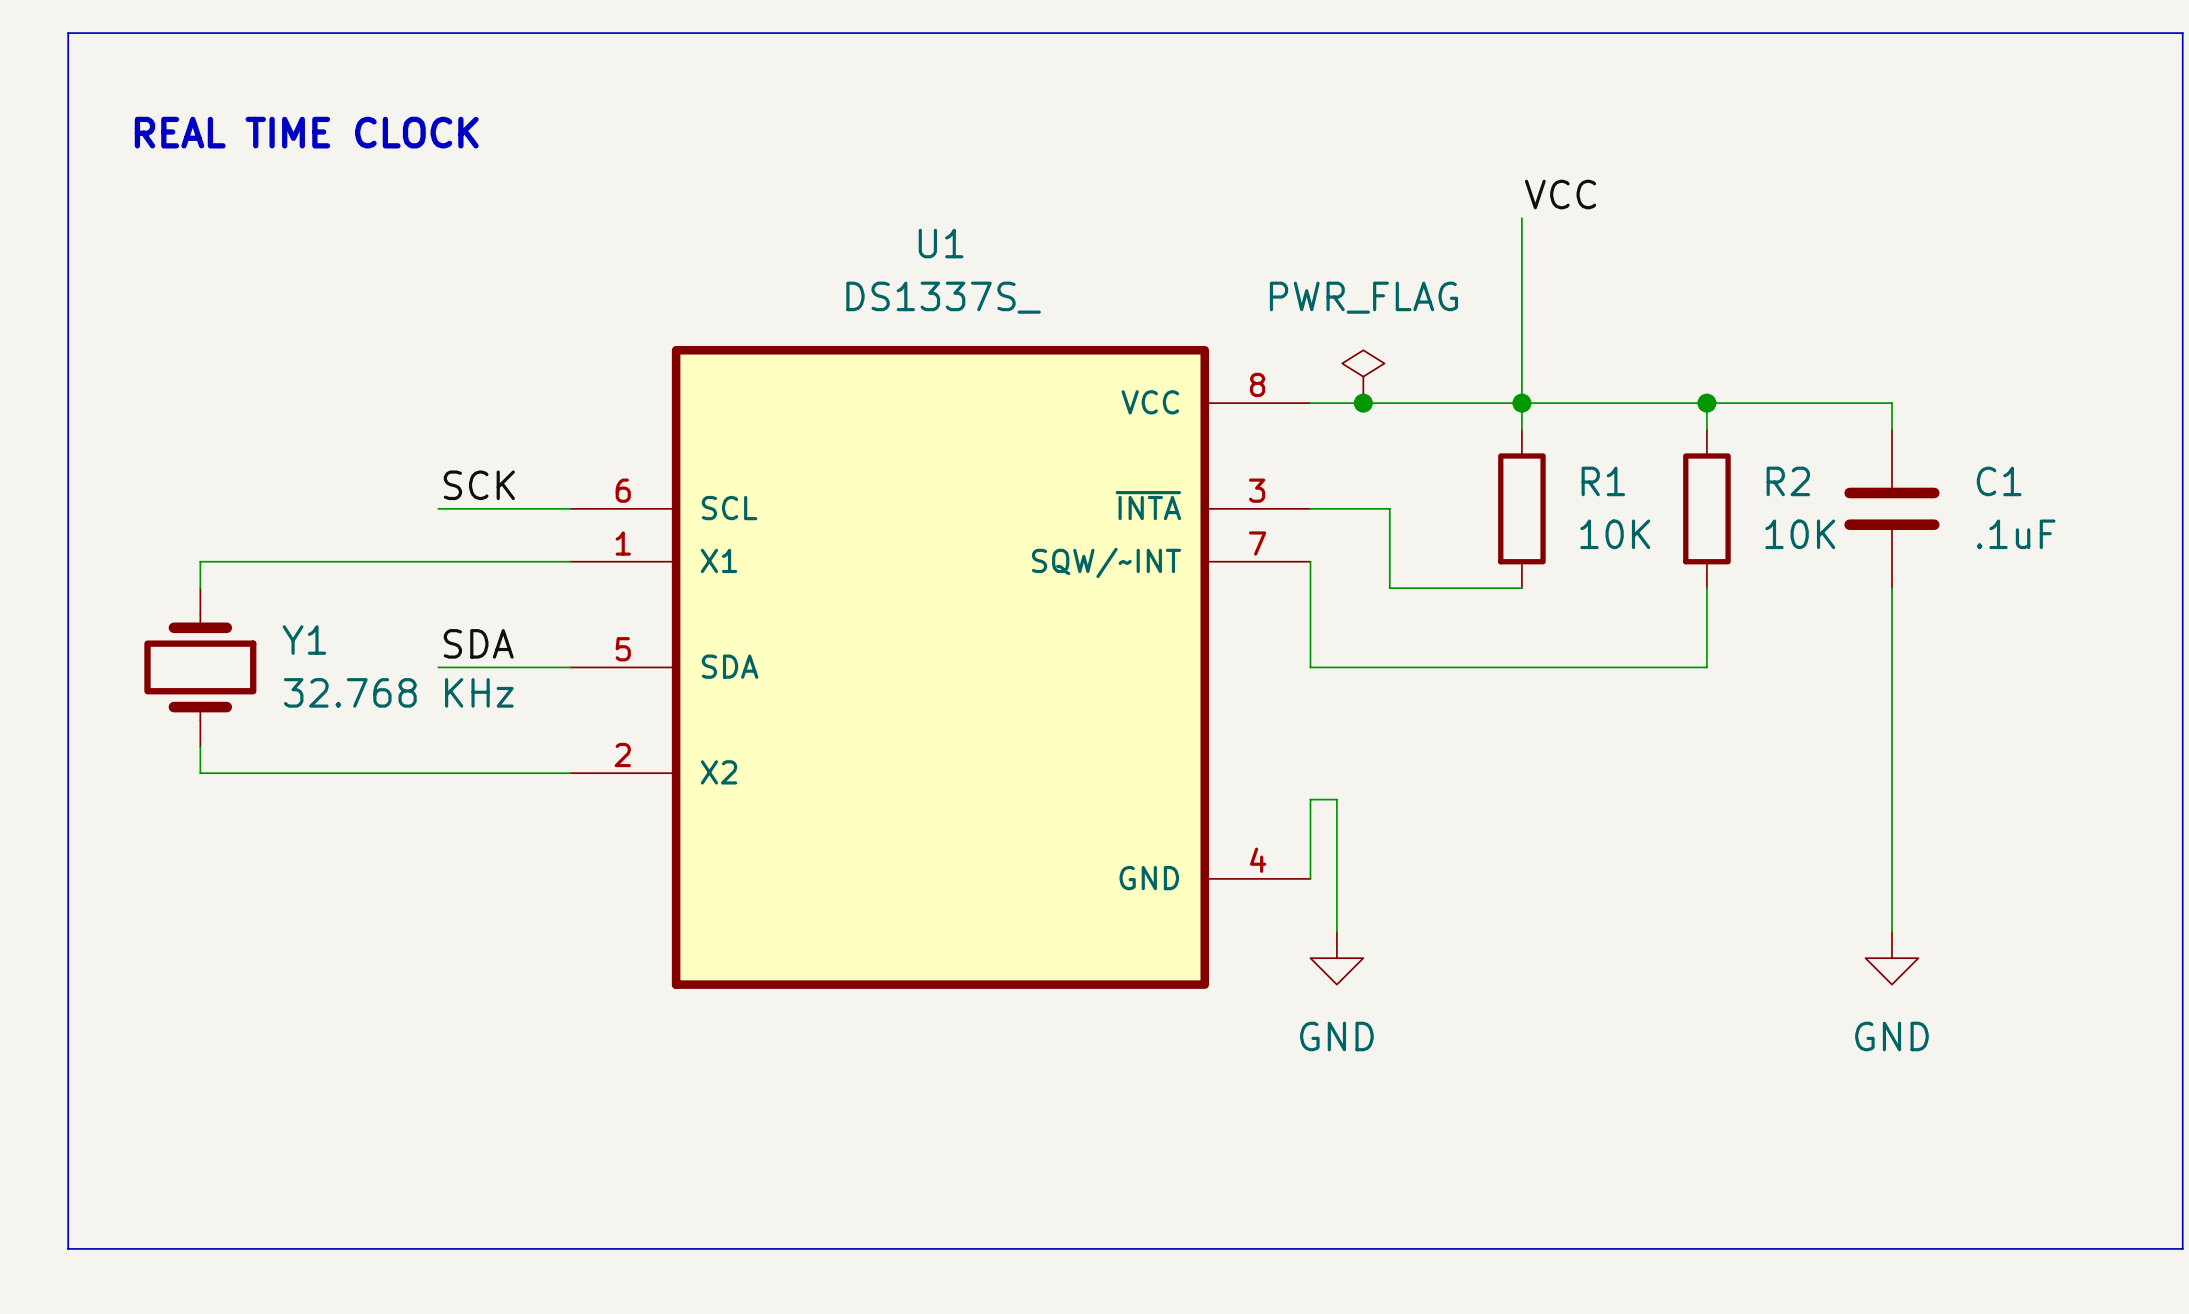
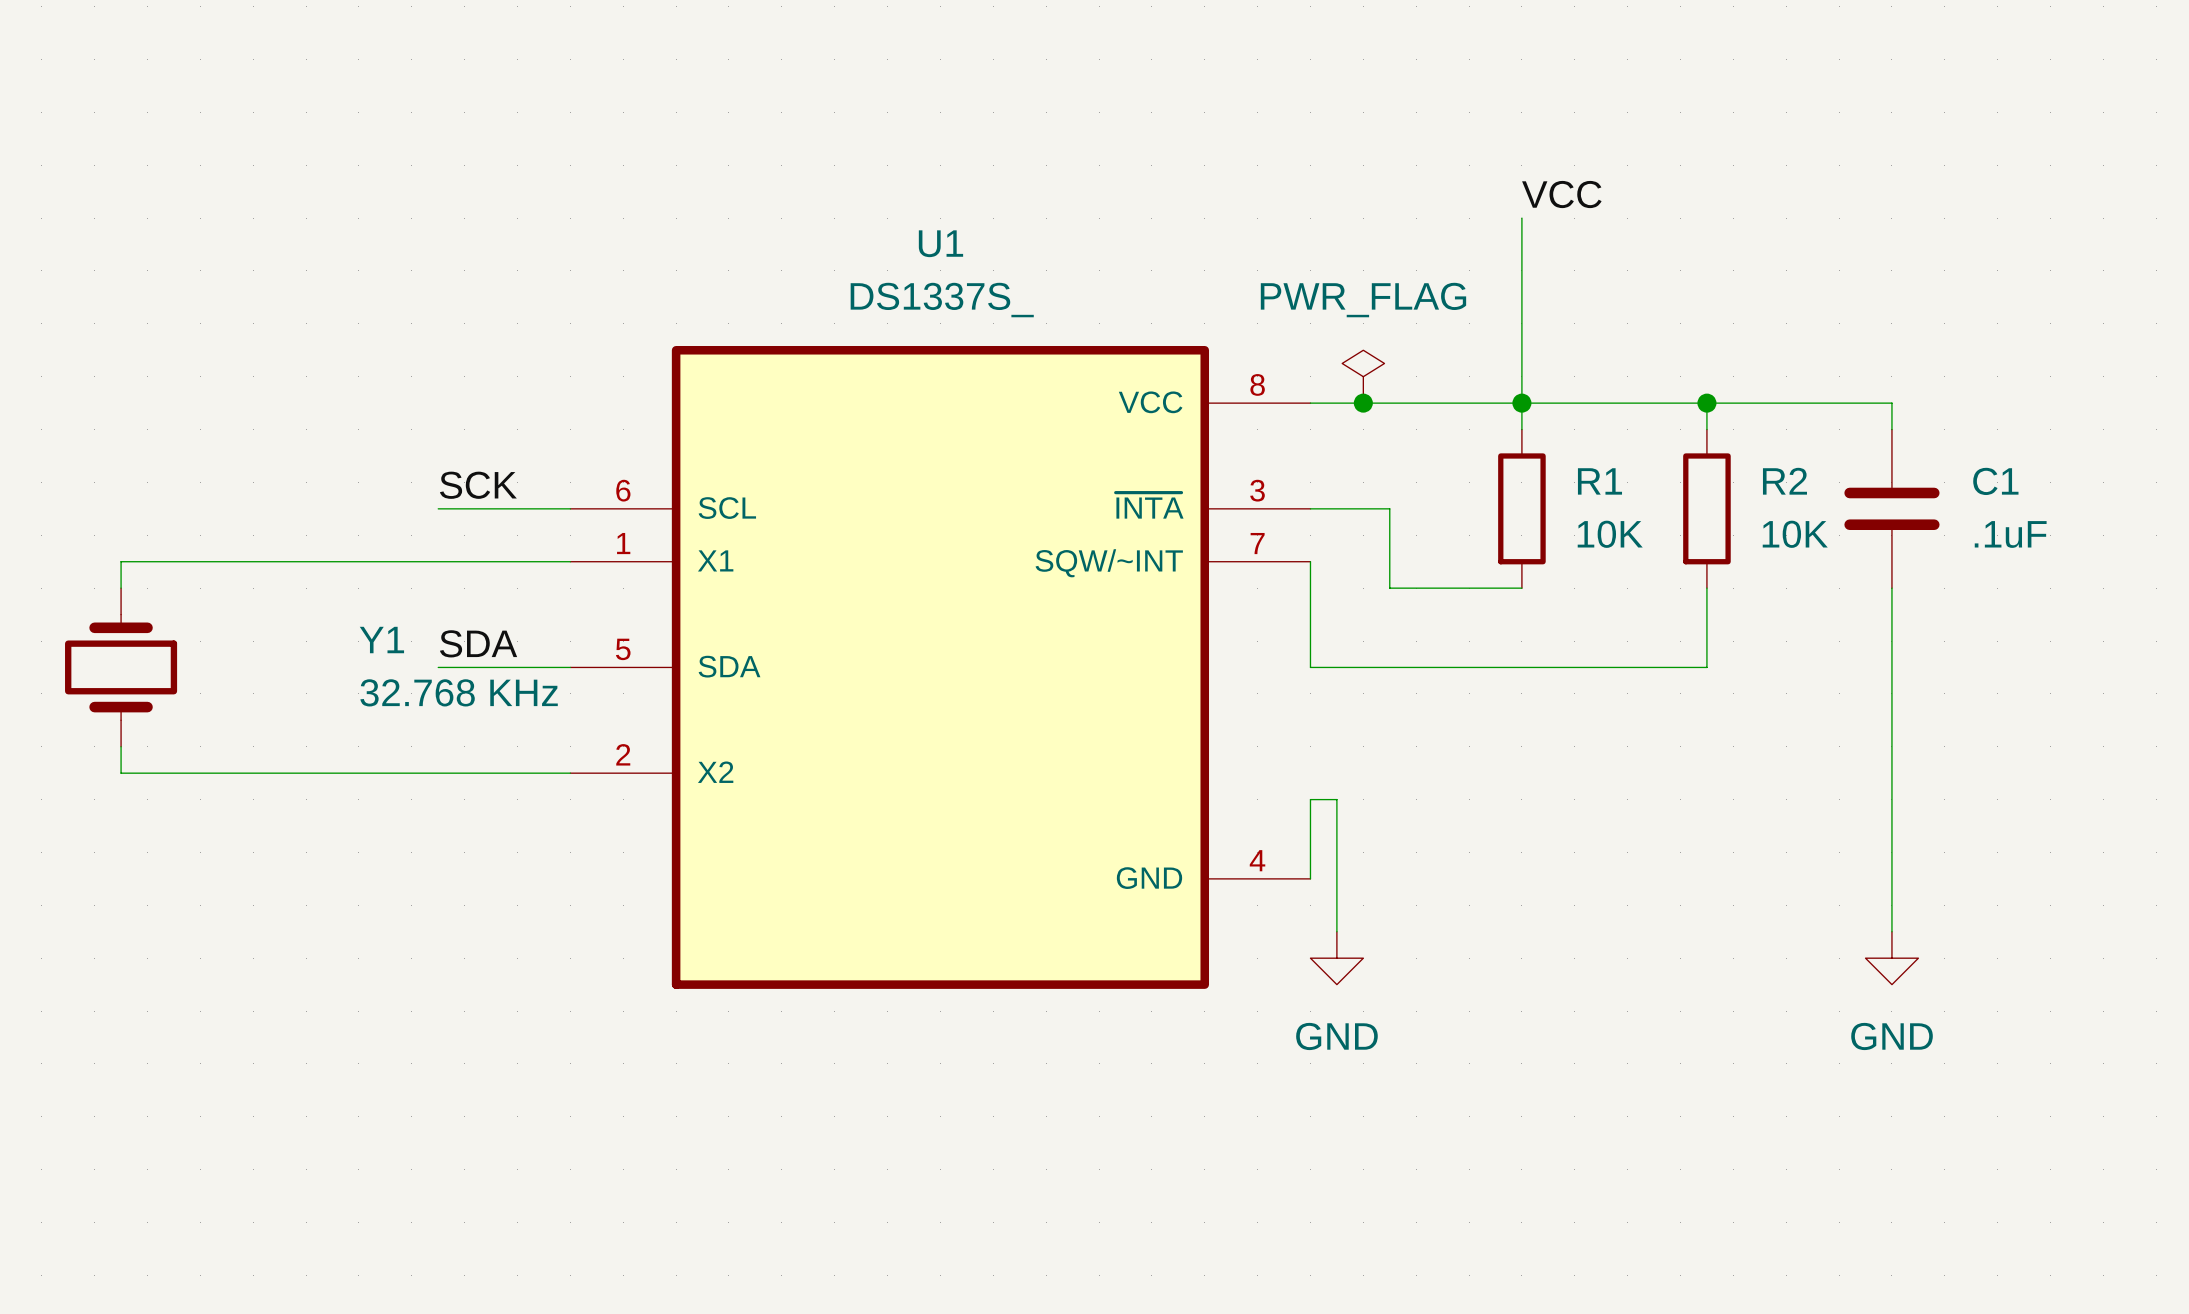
line: (68, 33) (2182, 33) (2182, 1248) (68, 1248) (68, 33) -> none
text: REAL TIME CLOCK (306, 132) -> none
wire: (200, 561) (200, 588) -> (200, 561) (121, 561) (121, 588)
Y1 name position: Y1 (304, 640) -> Y1 (381, 640)
Y1 position: (200, 667) -> (121, 667)
Y1 value position: 32.768 KHz (398, 692) -> 32.768 KHz (459, 692)
wire: (200, 746) (200, 773) -> (121, 746) (121, 773) (200, 773)

